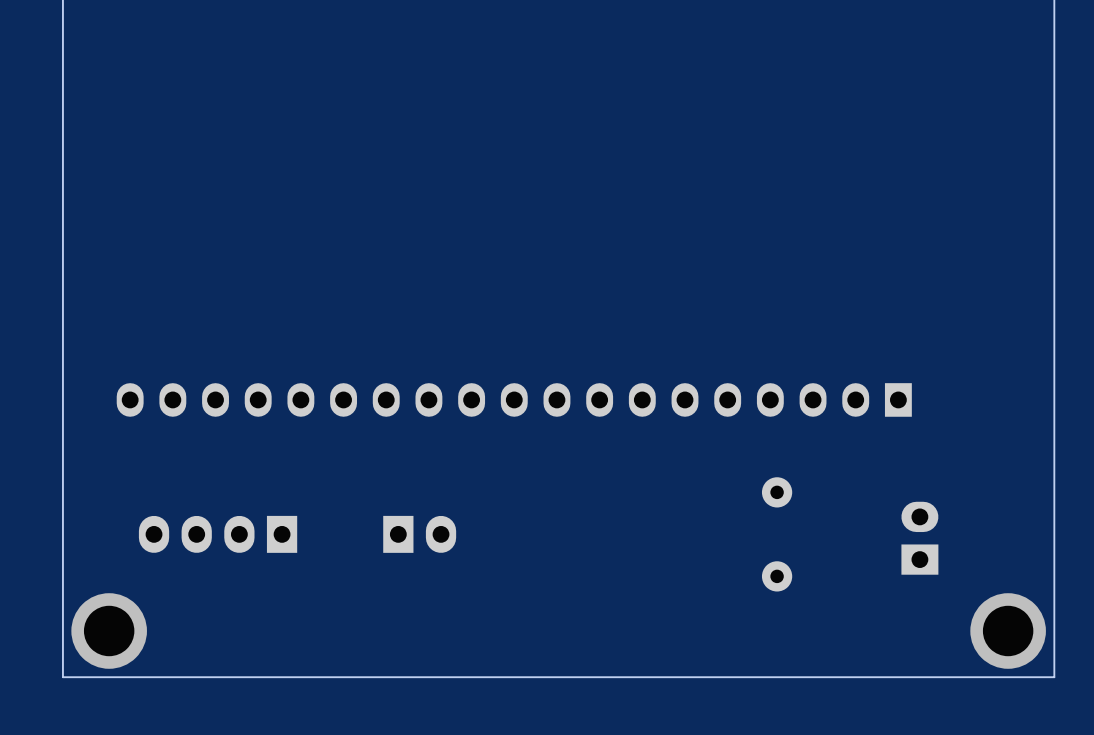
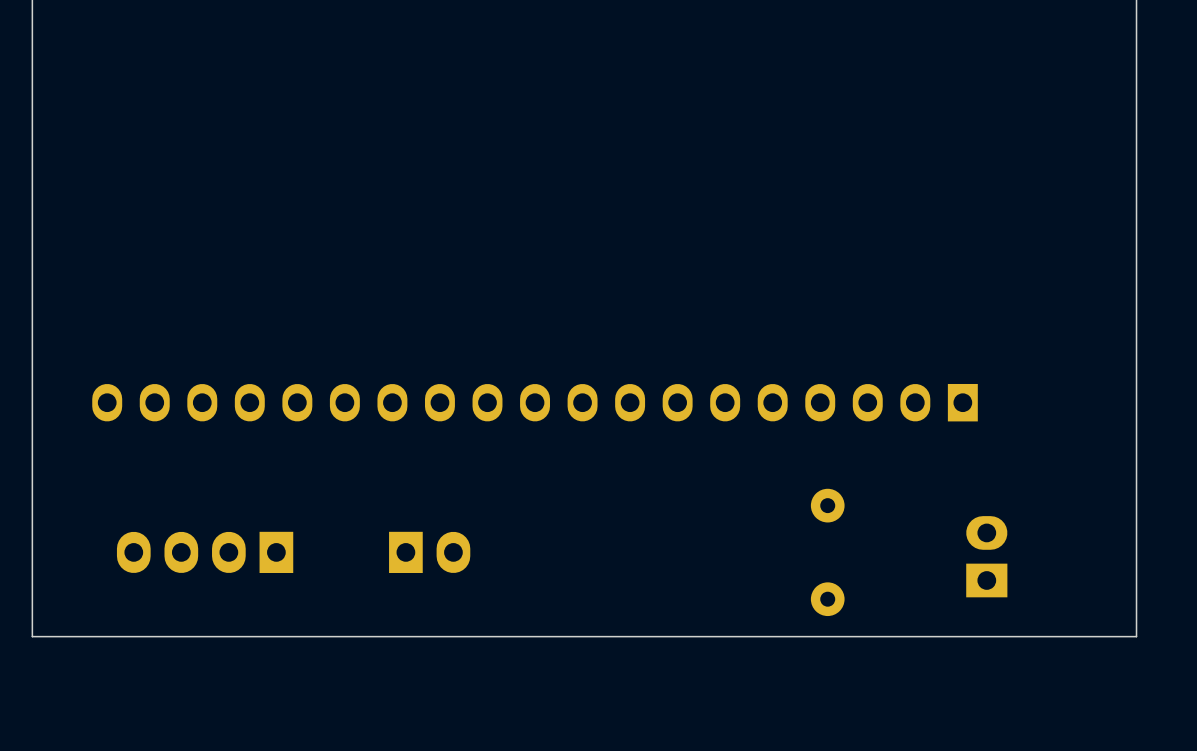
board edge: (1054, 609) (1054, 677) (62, 677) (62, 609) -> (1136, 636) (32, 636)
via: (109, 631) -> none
via: (1008, 631) -> none

